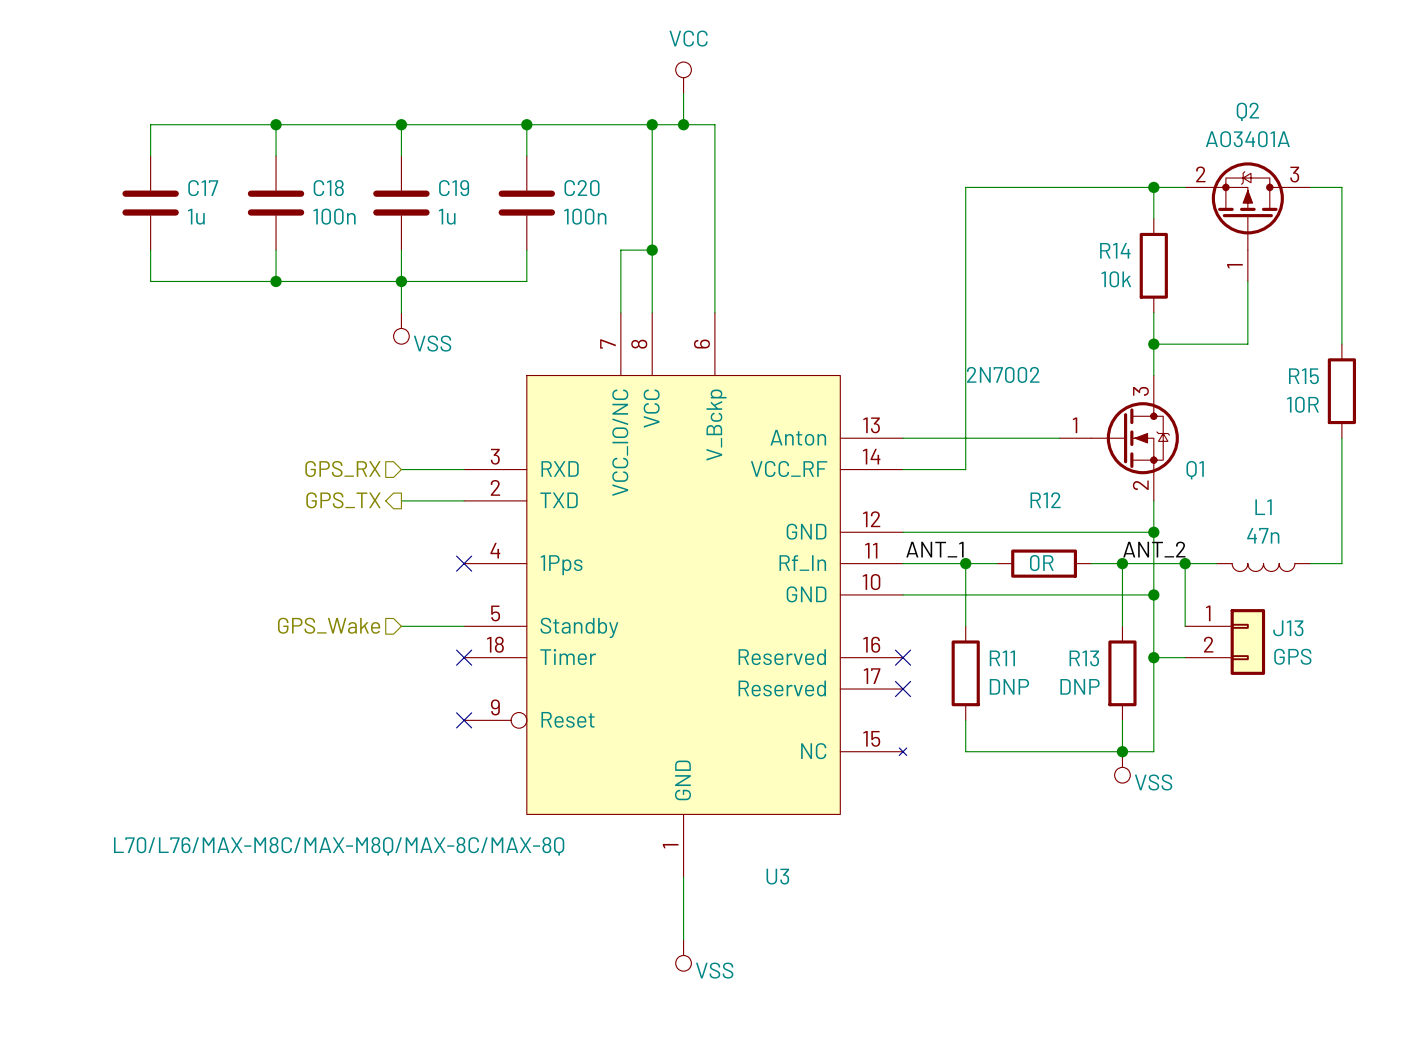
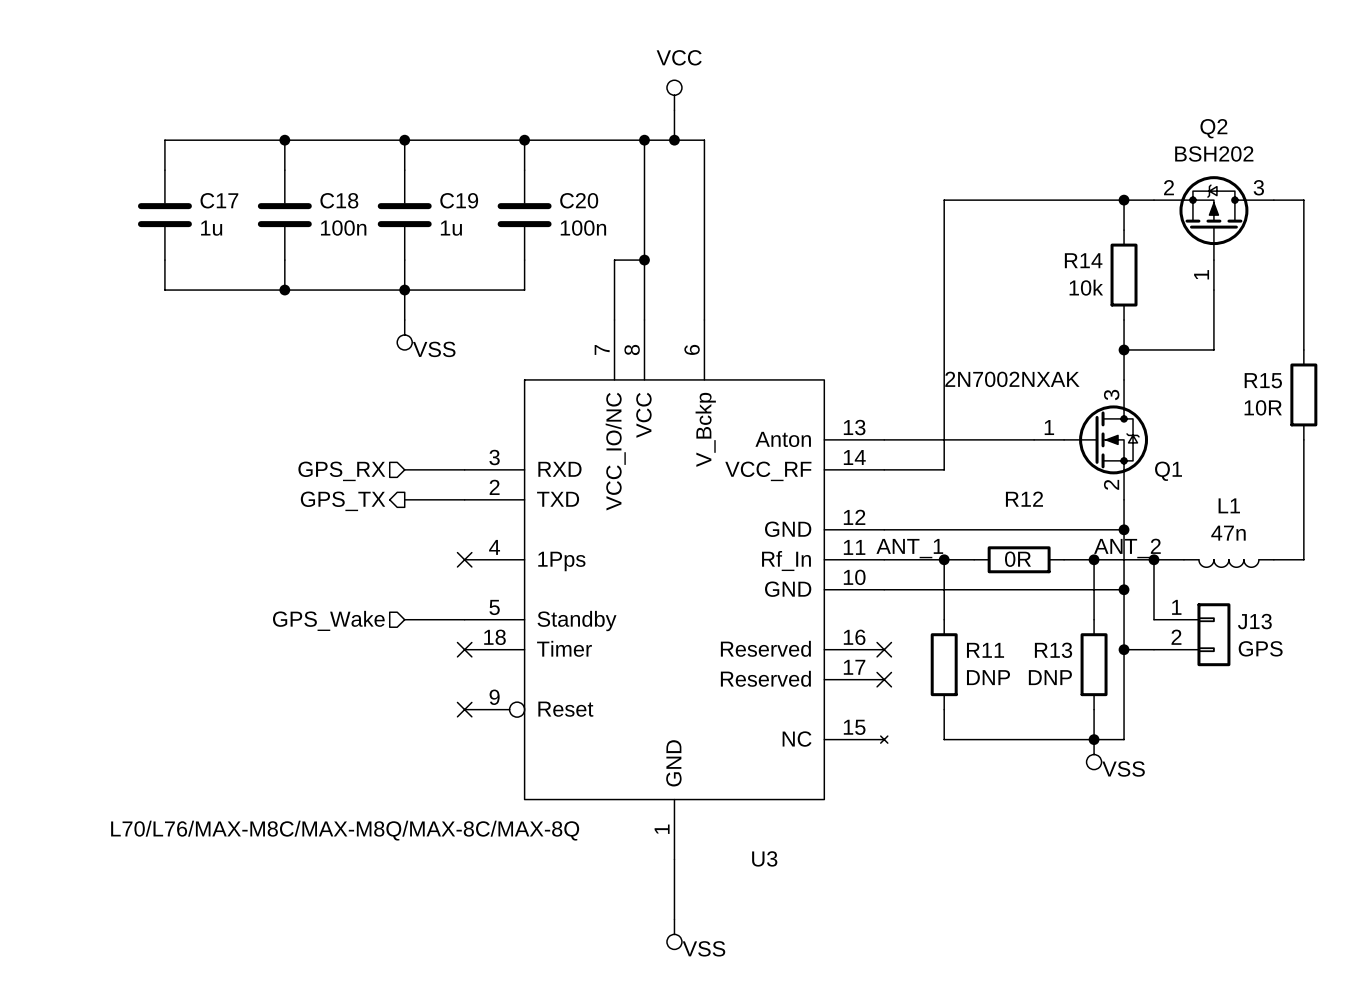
Q2 value: AO3401A (1247, 139) -> BSH202 (1214, 154)
Q1 value: 2N7002 (1003, 374) -> 2N7002NXAK (1012, 379)

